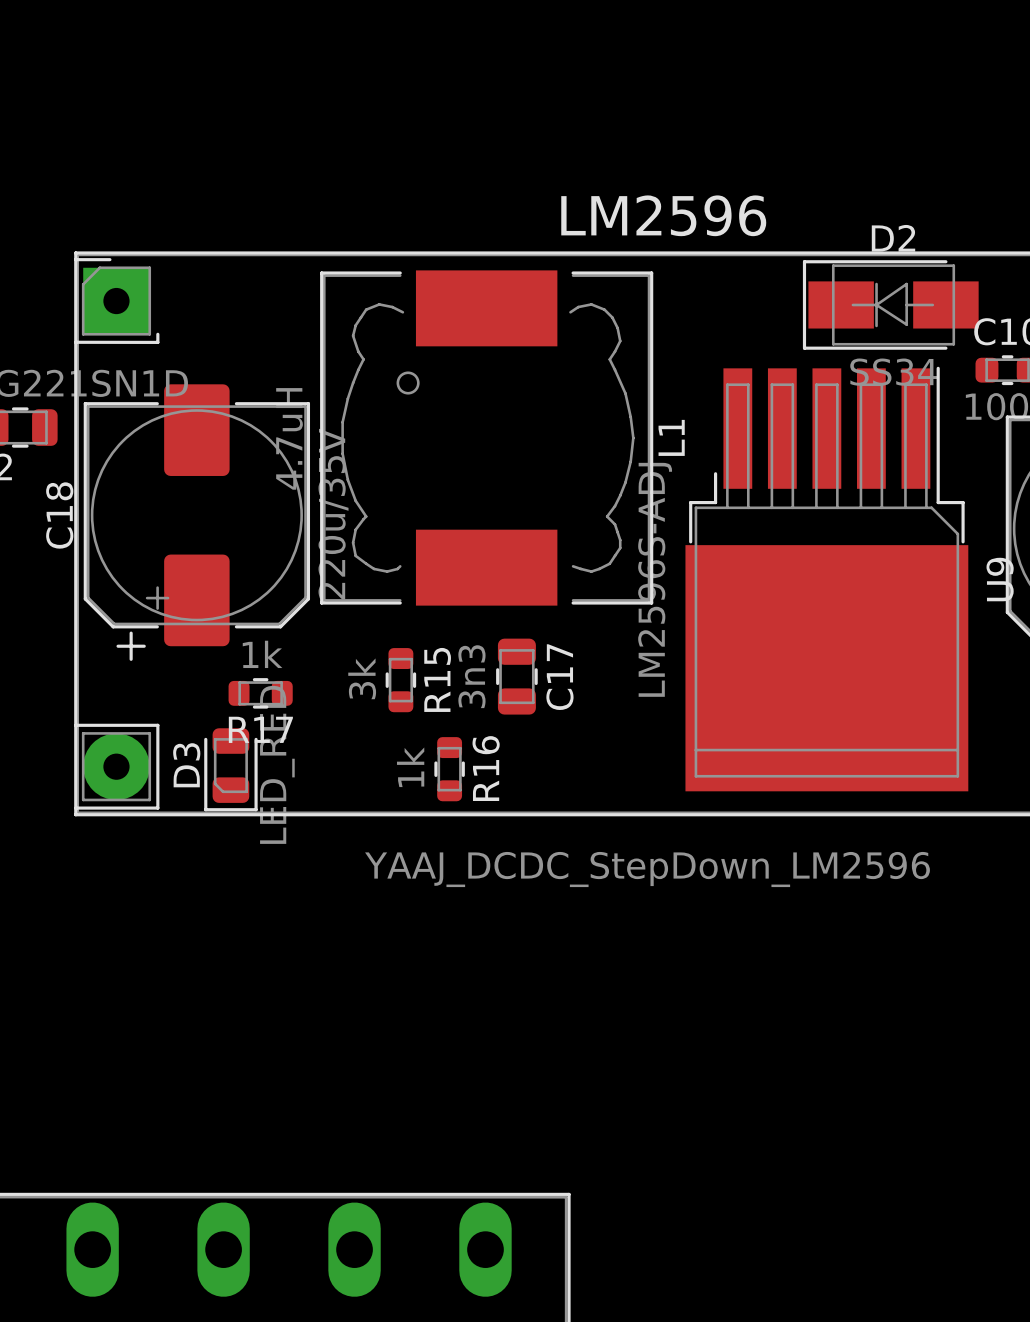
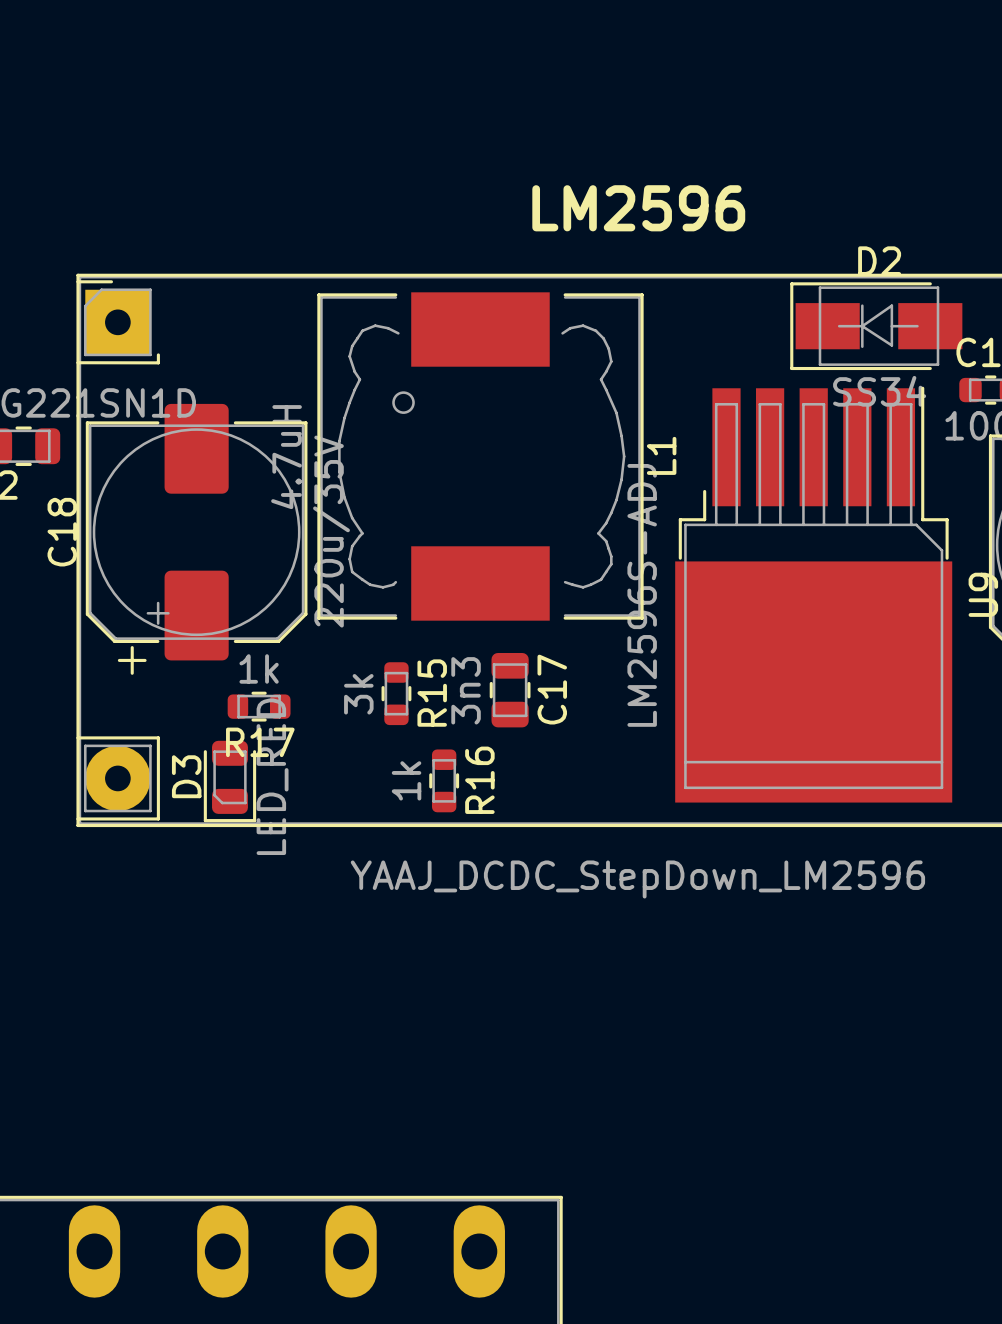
text position: LM2596 (663, 215) -> LM2596 (638, 208)

